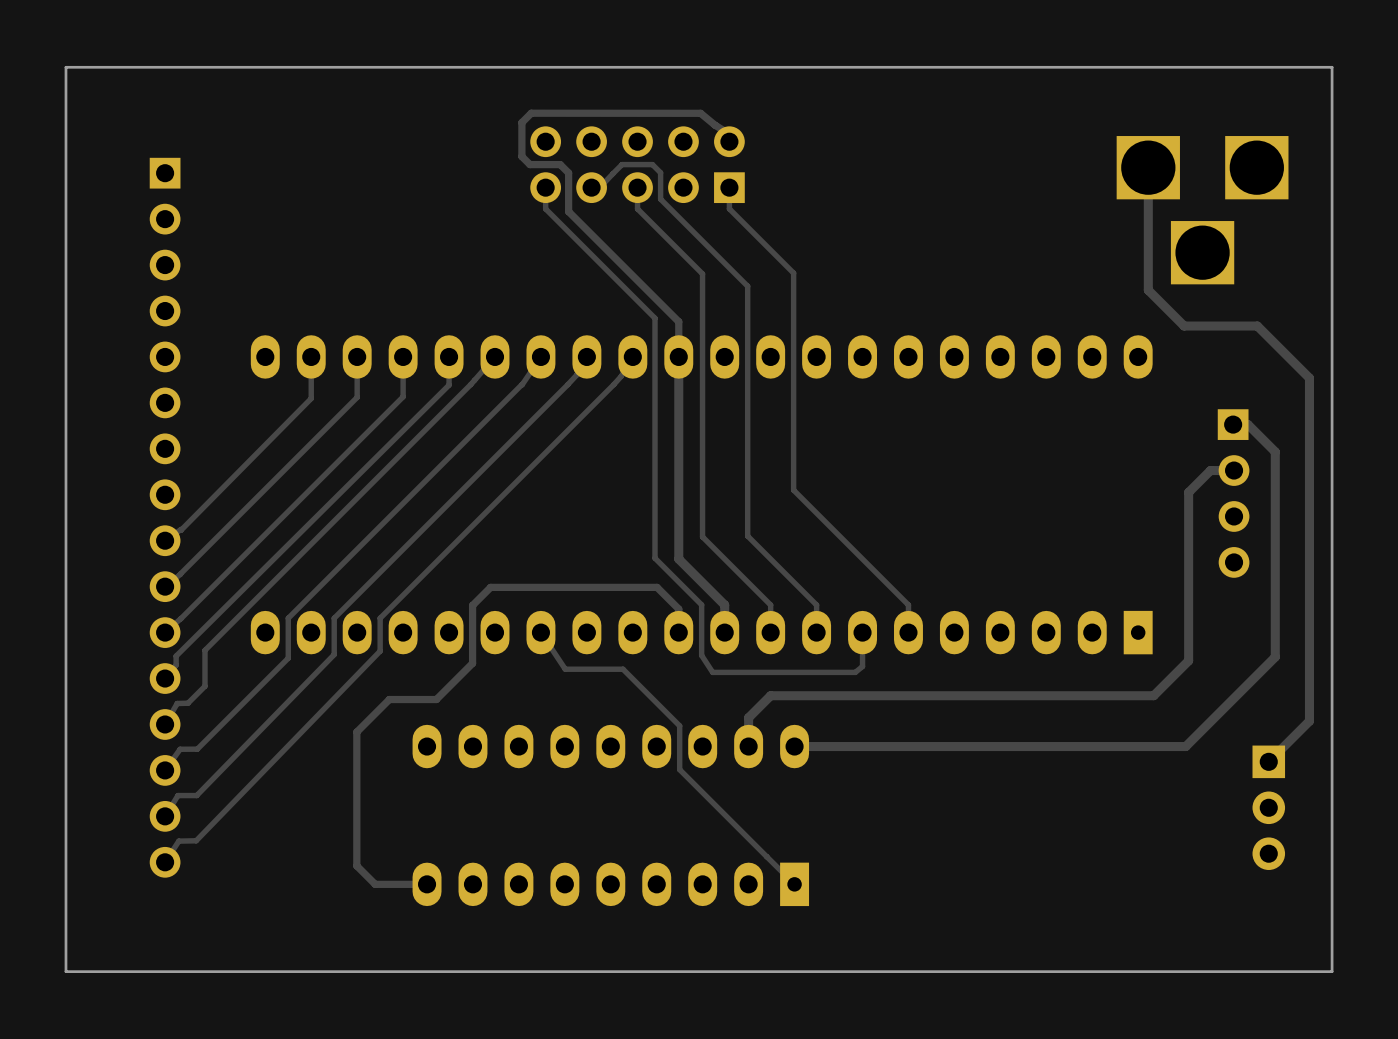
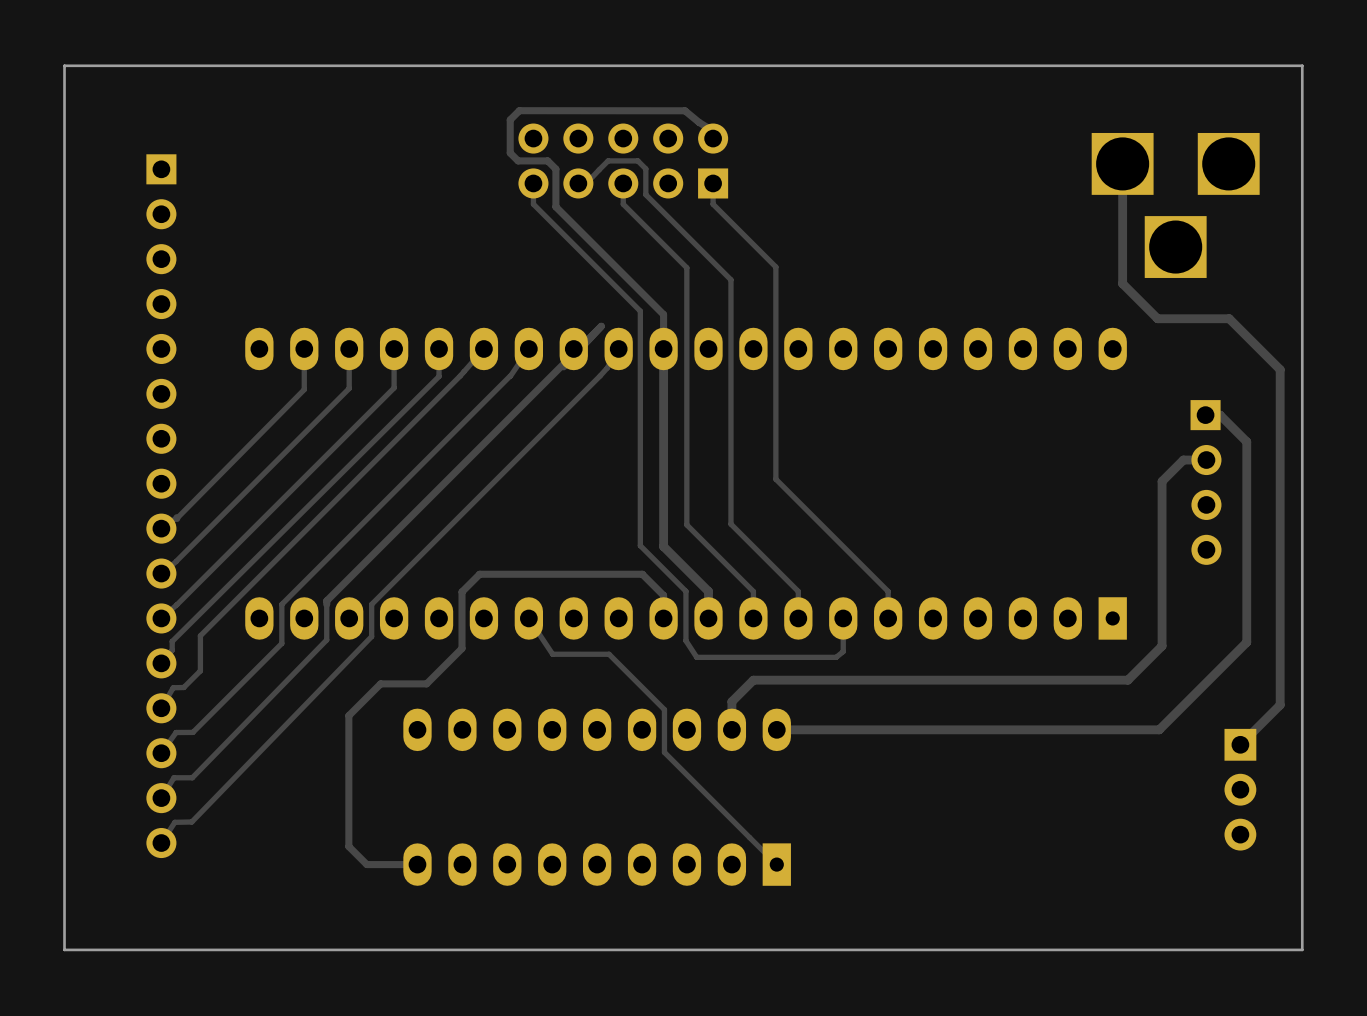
track: (576, 375) (334, 618) -> (563, 366) (601, 326) (326, 600) (326, 604)

